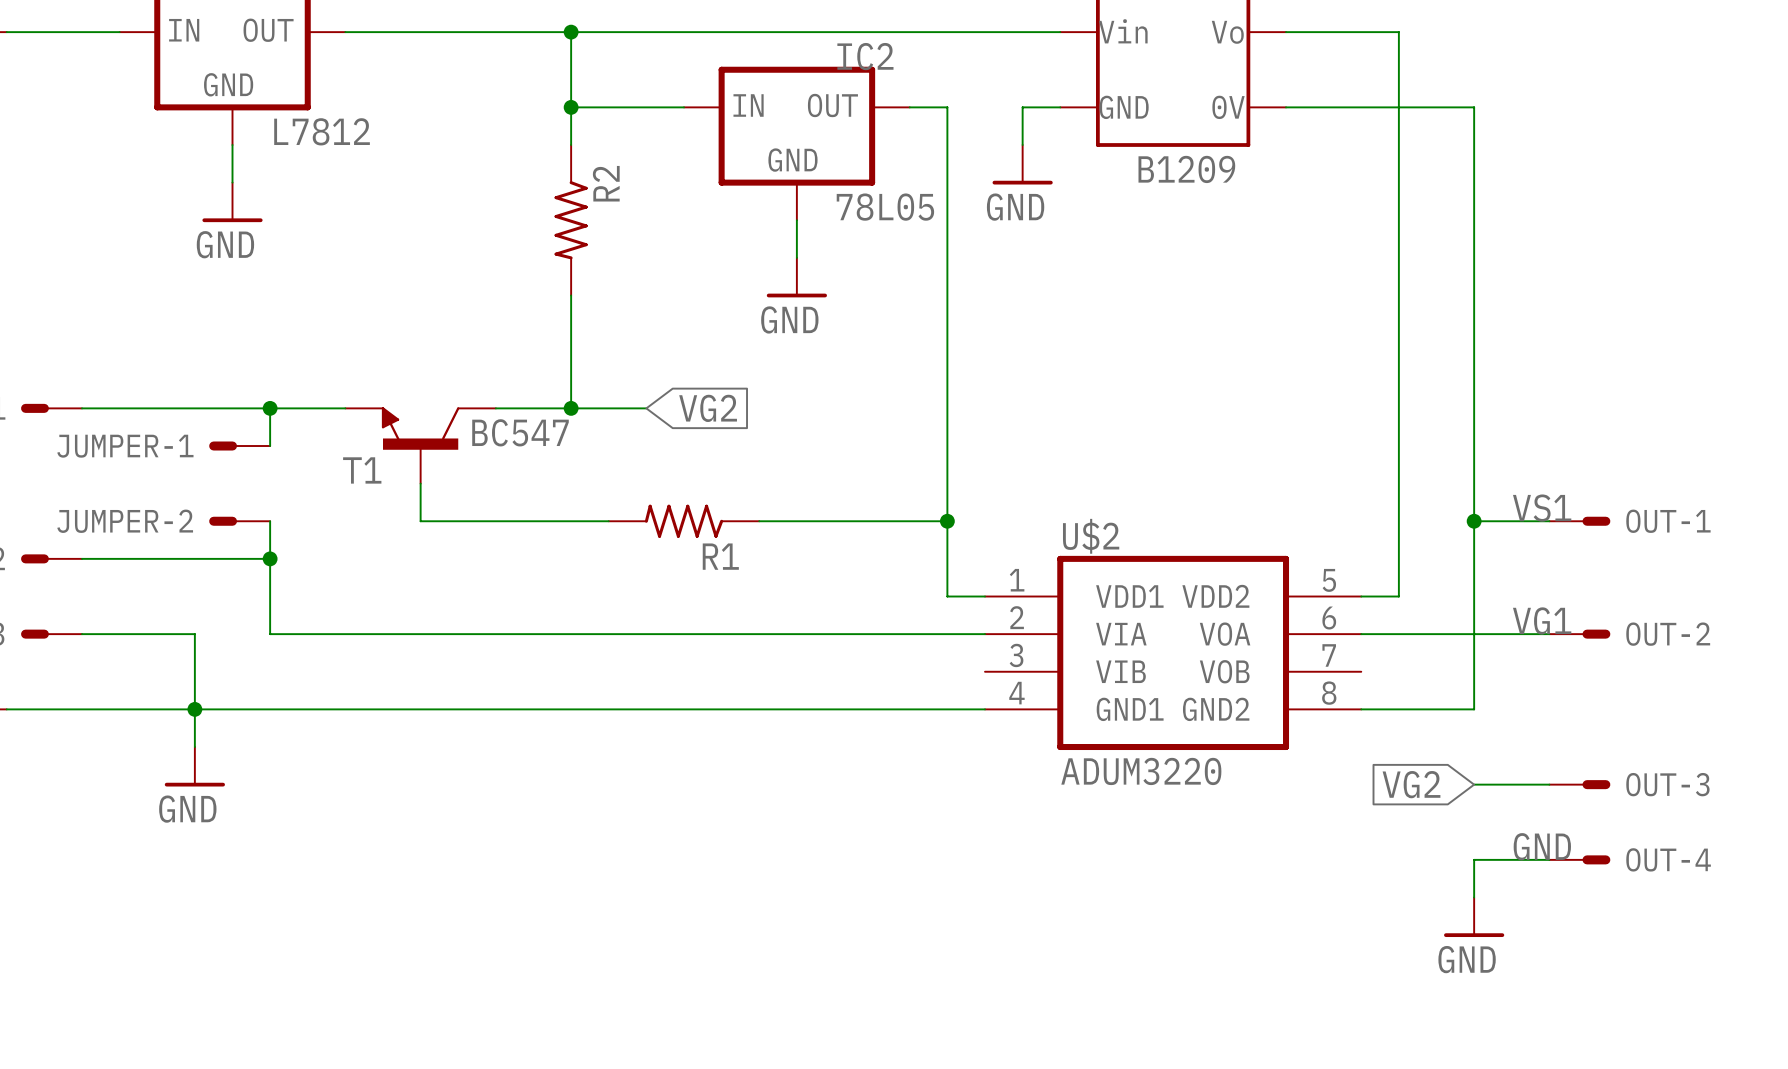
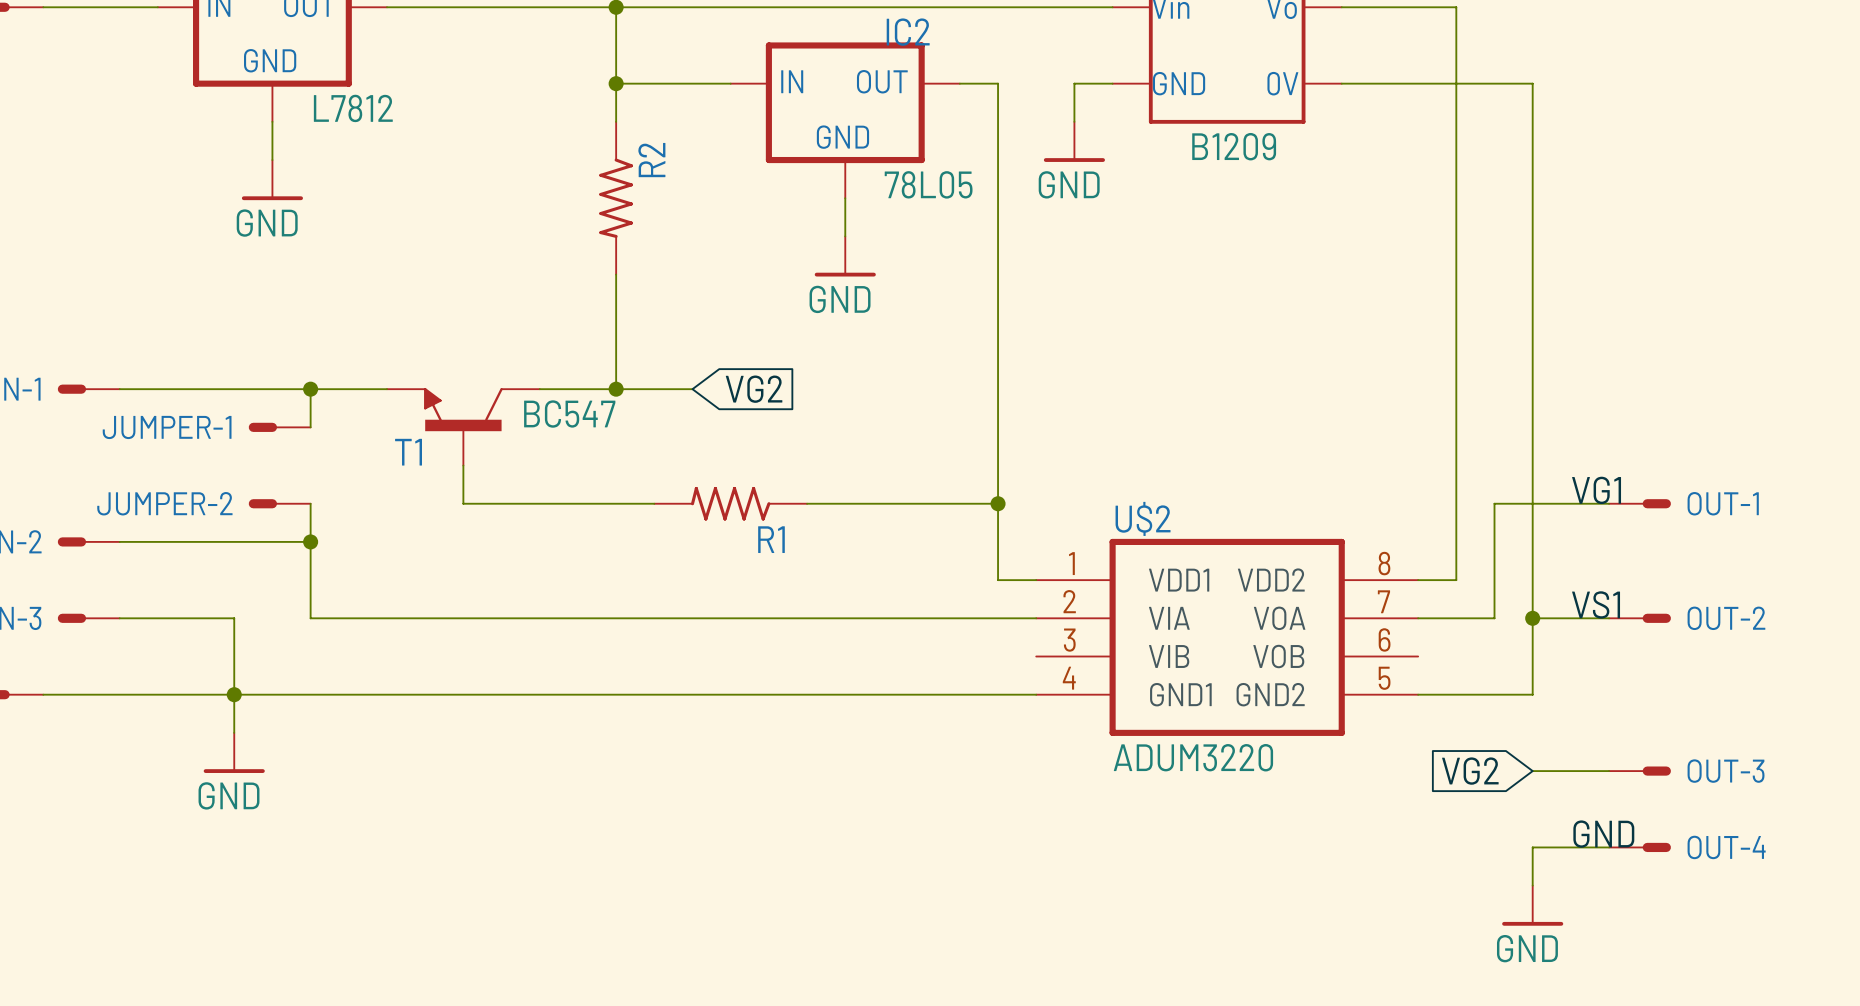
label: VS1 (1542, 508) -> VG1 (1596, 490)
junction: (1474, 521) -> none
U$2 pin number: 5 (1329, 580) -> 8 (1384, 563)
U$2 pin number: 6 (1329, 618) -> 7 (1383, 601)
label: VG1 (1542, 620) -> VS1 (1596, 604)
wire: (1436, 634) (1474, 634) -> (1494, 618) (1494, 503) (1532, 503)
junction: none -> (1532, 618)
U$2 pin number: 7 (1329, 655) -> 6 (1384, 639)
U$2 pin number: 8 (1329, 693) -> 5 (1384, 678)

